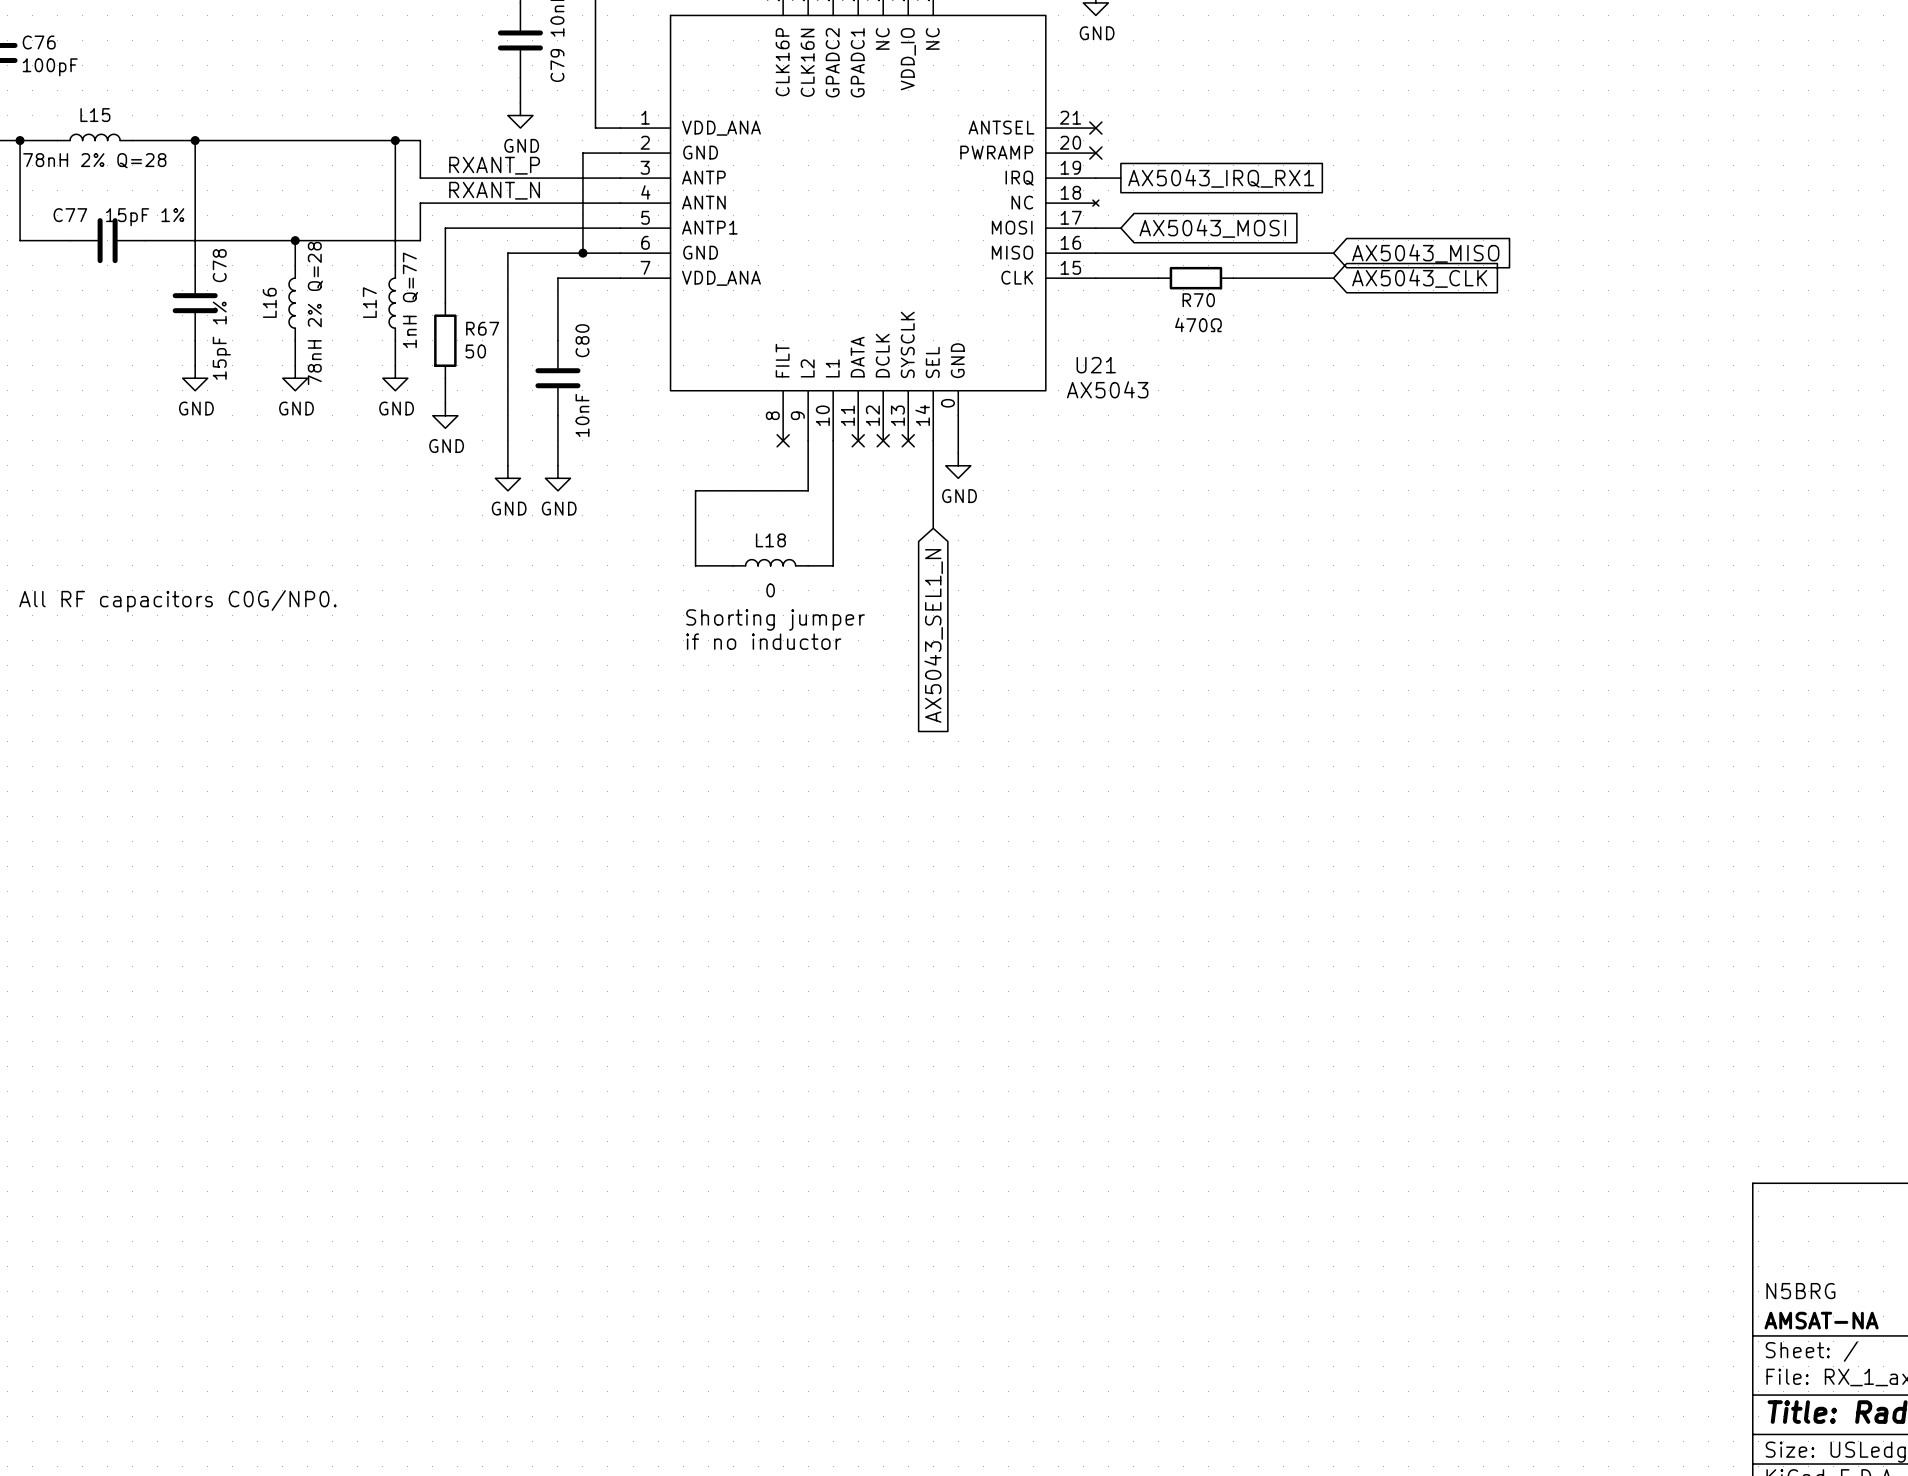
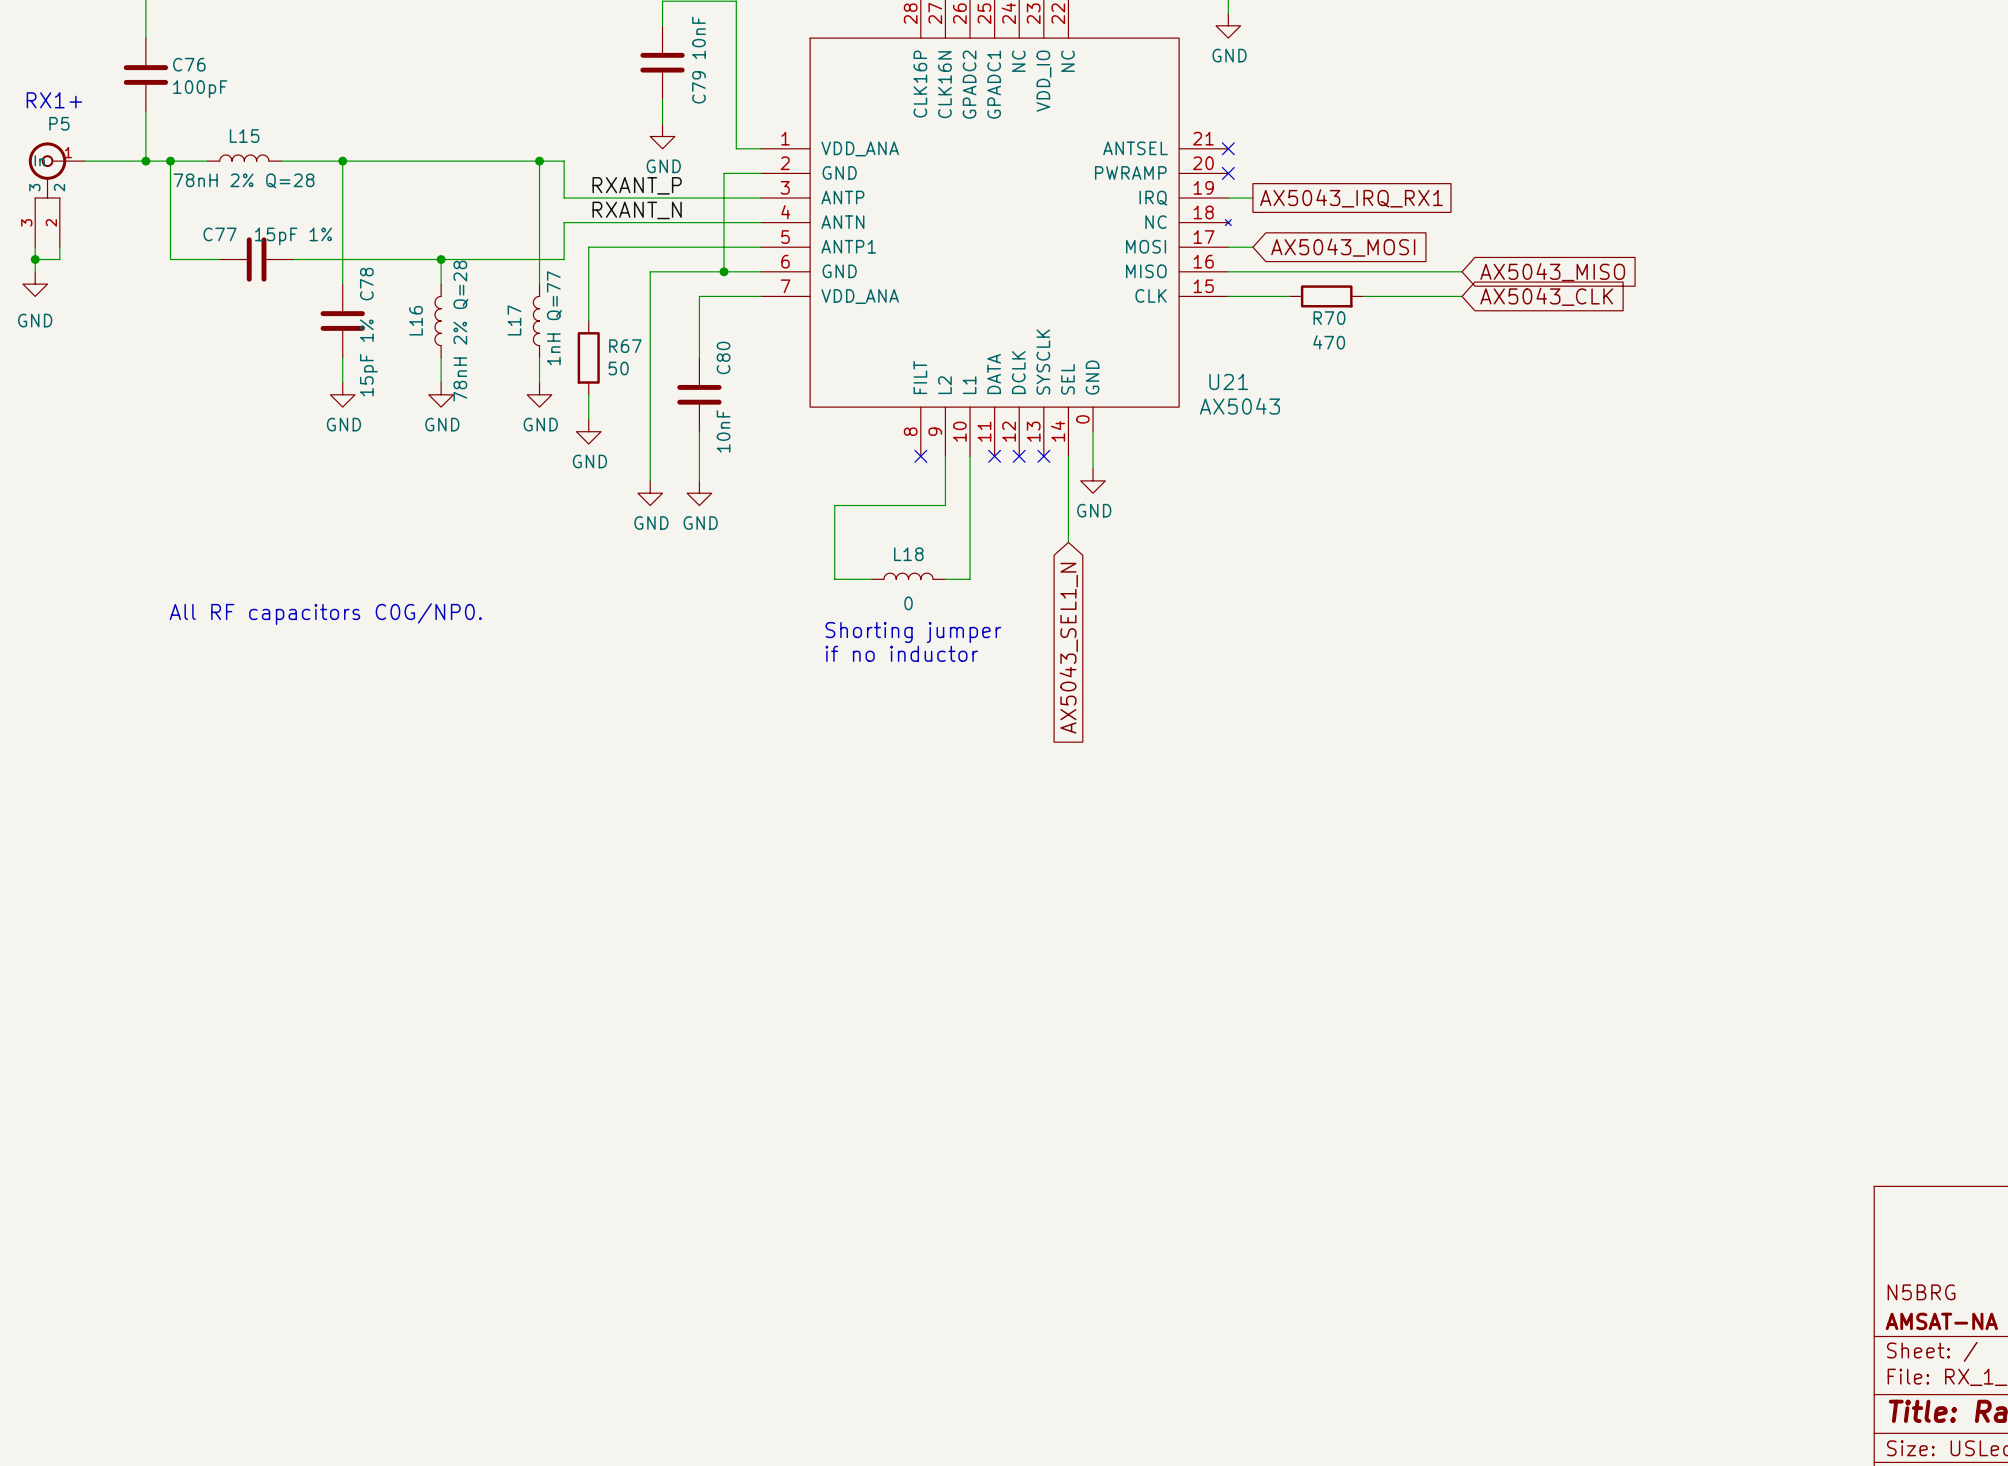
R70 value: 470Ω (1198, 324) -> 470 (1329, 342)

